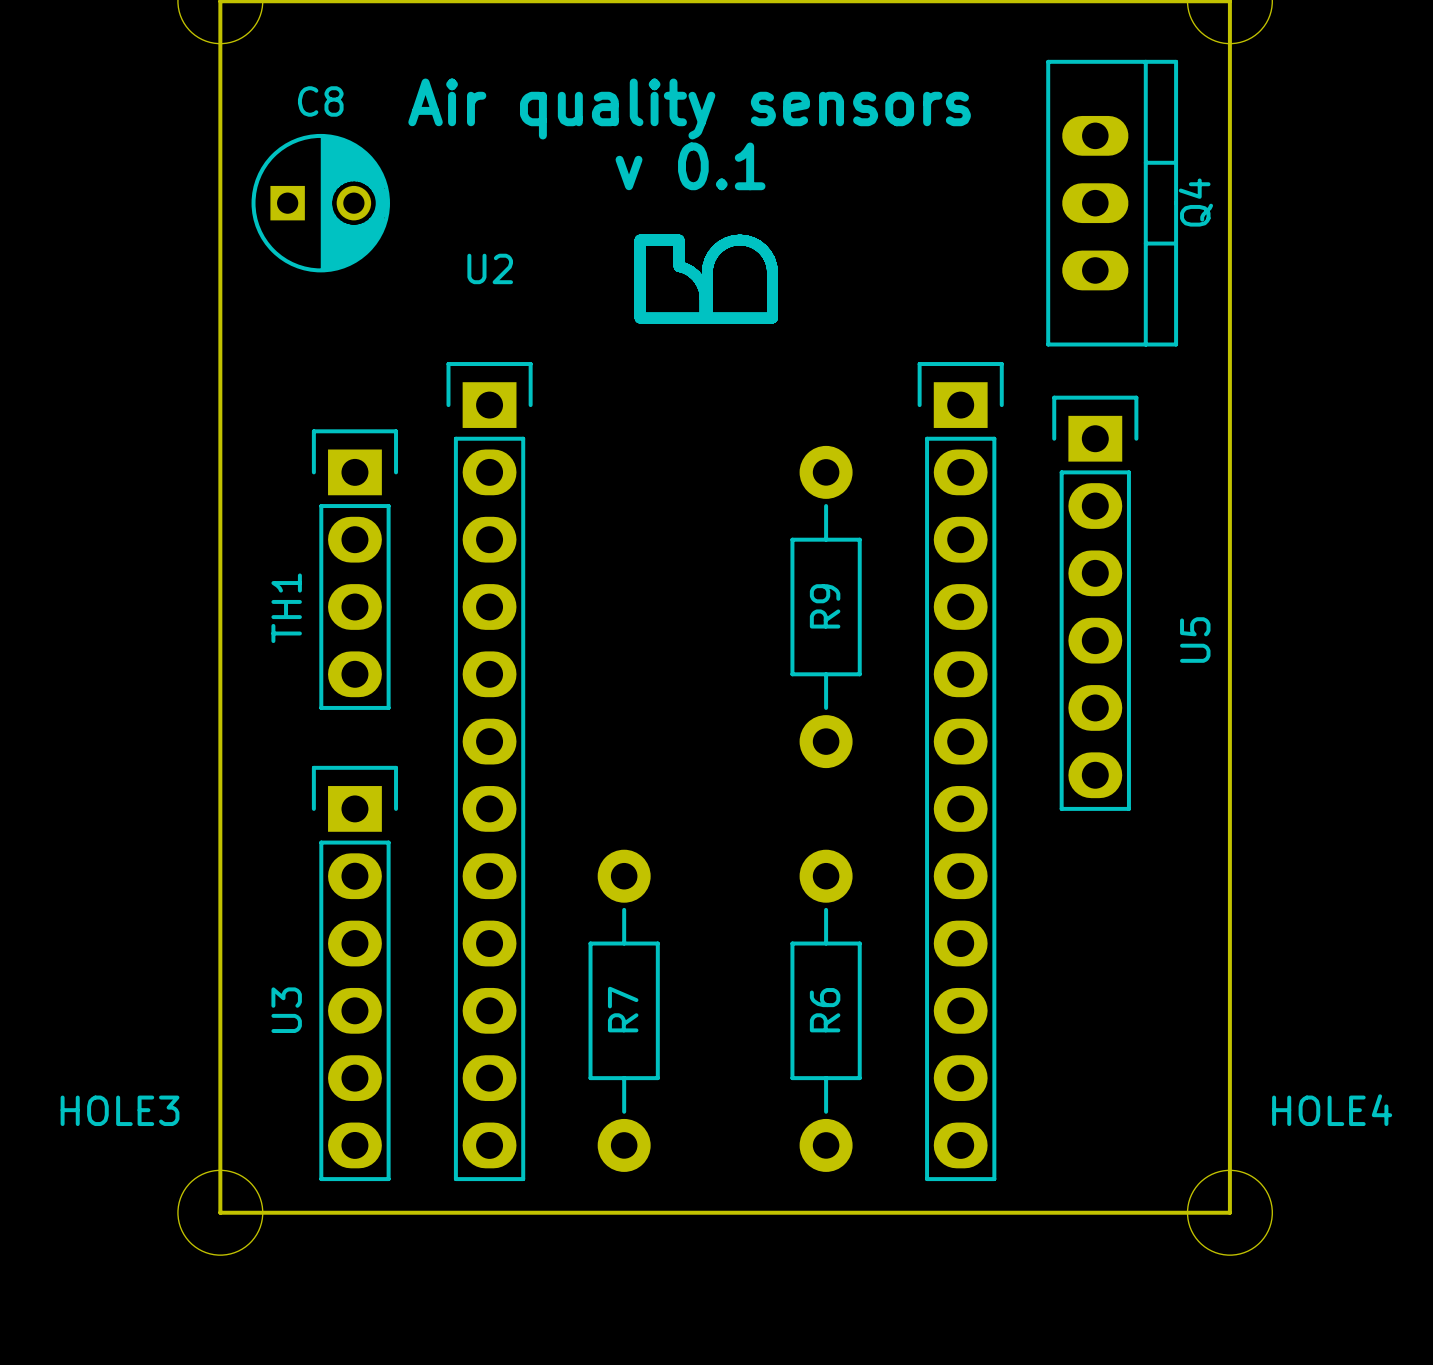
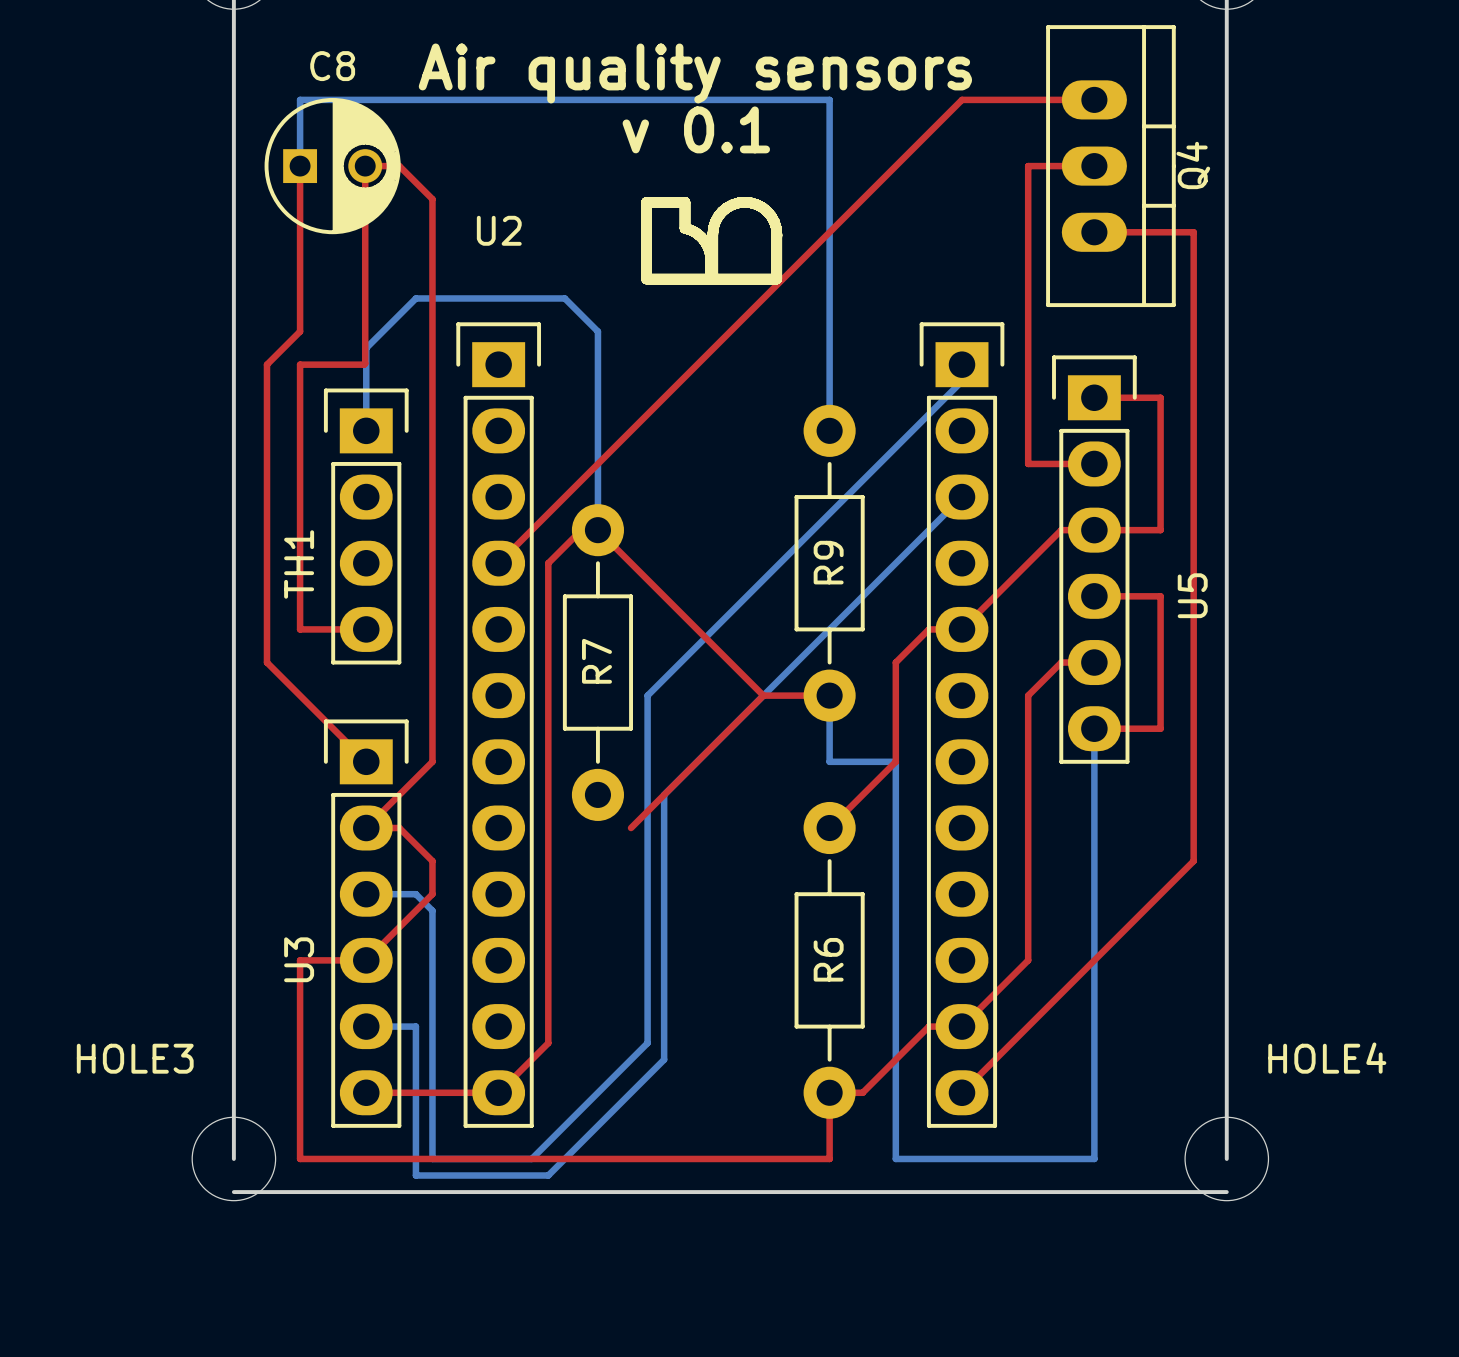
top track: none -> (1094, 99) (962, 99) (498, 563)
bottom track: none -> (300, 166) (300, 99) (829, 99) (829, 430)
top track: none -> (300, 166) (300, 331) (266, 364) (266, 662) (366, 761)
top track: none -> (1094, 166) (1028, 166) (1028, 463) (1094, 463)
top track: none -> (1094, 232) (1193, 232) (1193, 861) (962, 1092)
bottom track: none -> (962, 364) (962, 381) (647, 695) (647, 1043) (531, 1158) (432, 1158) (432, 910) (415, 894) (366, 894)
top track: none -> (1094, 397) (1160, 397) (1160, 530) (1061, 530) (962, 629) (928, 629) (895, 662) (895, 761) (829, 828)
bottom track: none -> (366, 430) (366, 348) (415, 298) (564, 298) (597, 331) (597, 530)
bottom track: none -> (962, 497) (664, 794) (664, 1059) (548, 1175) (415, 1175) (415, 1026) (366, 1026)
top track: none -> (1094, 596) (1160, 596) (1160, 728) (1094, 728)
top track: none -> (366, 629) (300, 629) (300, 364) (365, 363) (365, 166) (399, 166) (432, 199) (432, 761) (366, 828) (399, 828) (432, 861) (432, 894) (366, 960) (300, 960) (300, 1158) (829, 1158) (829, 1092) (862, 1092) (928, 1026) (962, 1026) (1028, 960) (1028, 695) (1061, 662) (1094, 662)
top track: none -> (763, 695) (829, 695)
top track: none -> (763, 695) (597, 530) (581, 530) (548, 563) (548, 1043) (498, 1092) (366, 1092)
top track: none -> (763, 695) (631, 828)
bottom track: none -> (829, 695) (829, 761) (895, 761) (895, 1158) (1094, 1158) (1094, 728)
R7 position: (624, 1010) -> (597, 662)
board edge: (220, 1212) (1229, 1212) -> (233, 1192) (1226, 1192)

